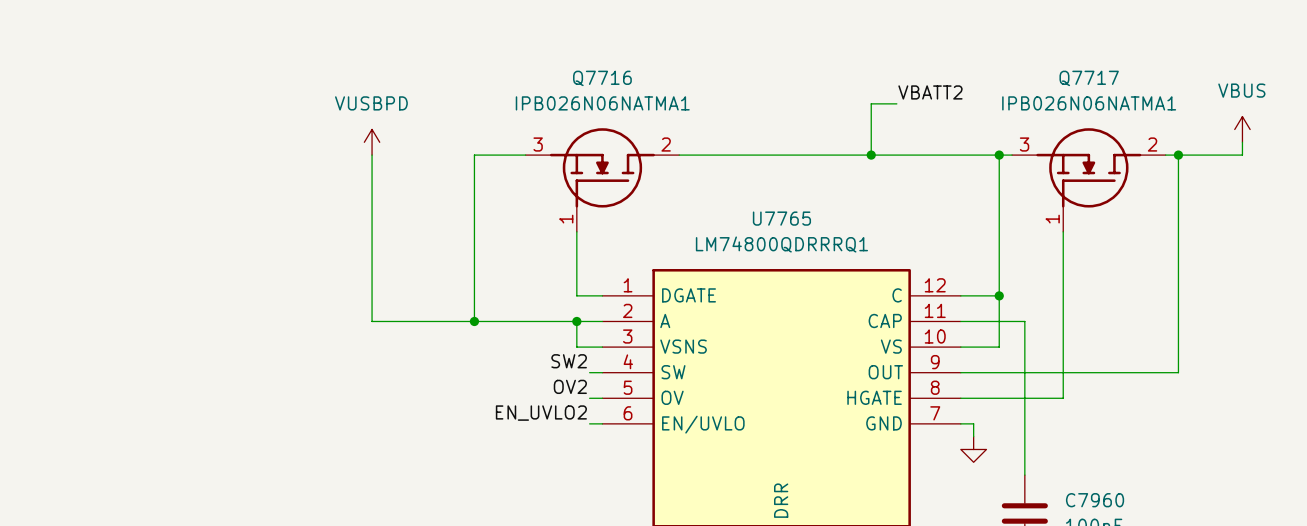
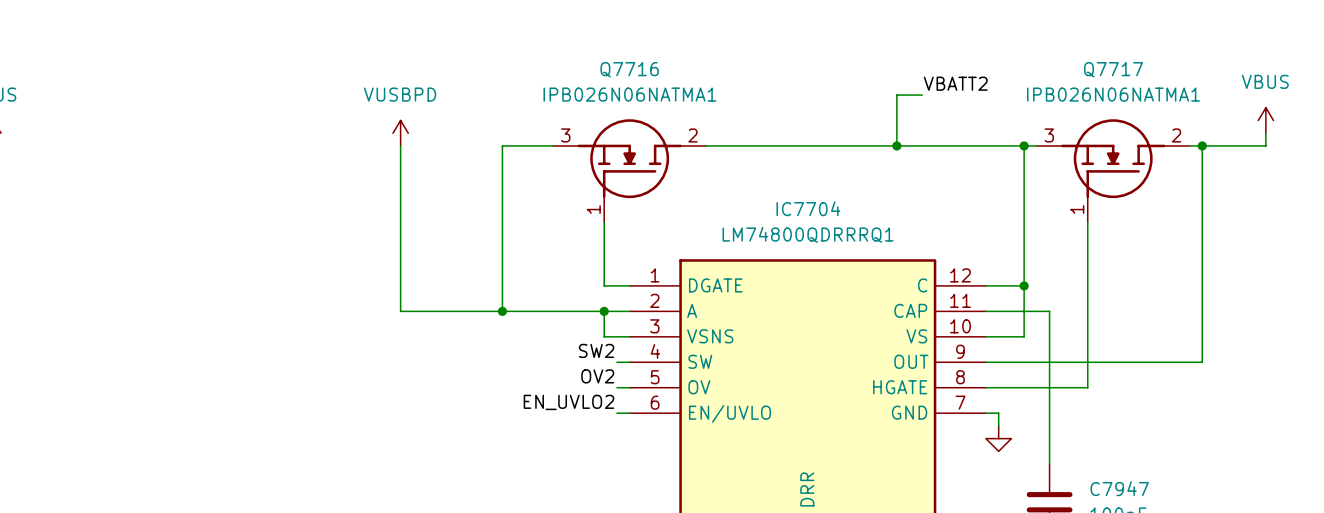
U7765 name: U7765 (781, 218) -> IC7704 (808, 208)
C7960 name: C7960 (1095, 500) -> C7947 (1119, 488)

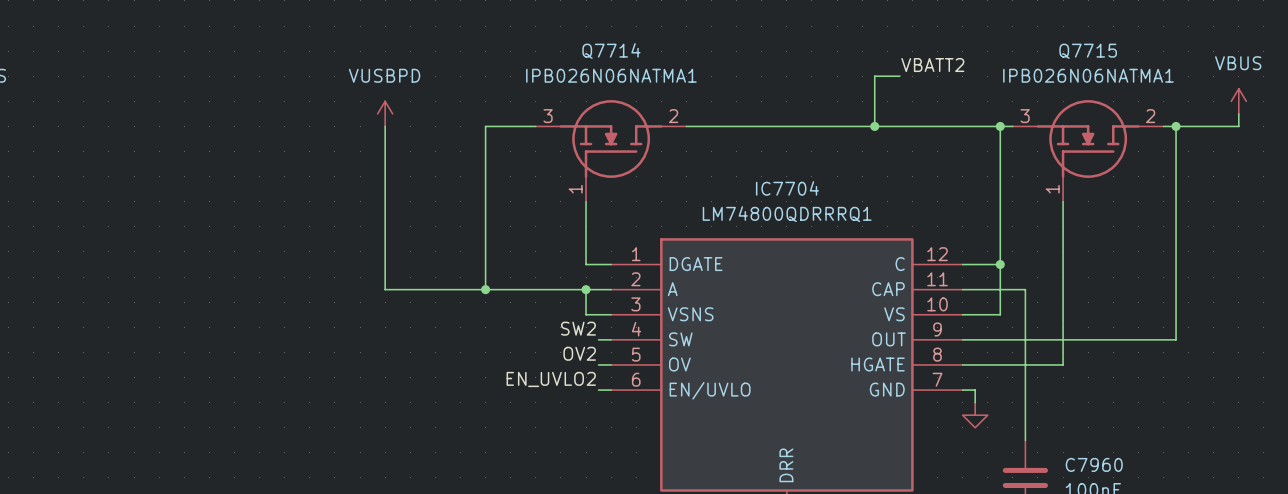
Q7716 name: Q7716 (629, 69) -> Q7714 (611, 50)
Q7717 name: Q7717 (1113, 69) -> Q7715 (1088, 51)
C7947 name: C7947 (1119, 488) -> C7960 (1094, 464)

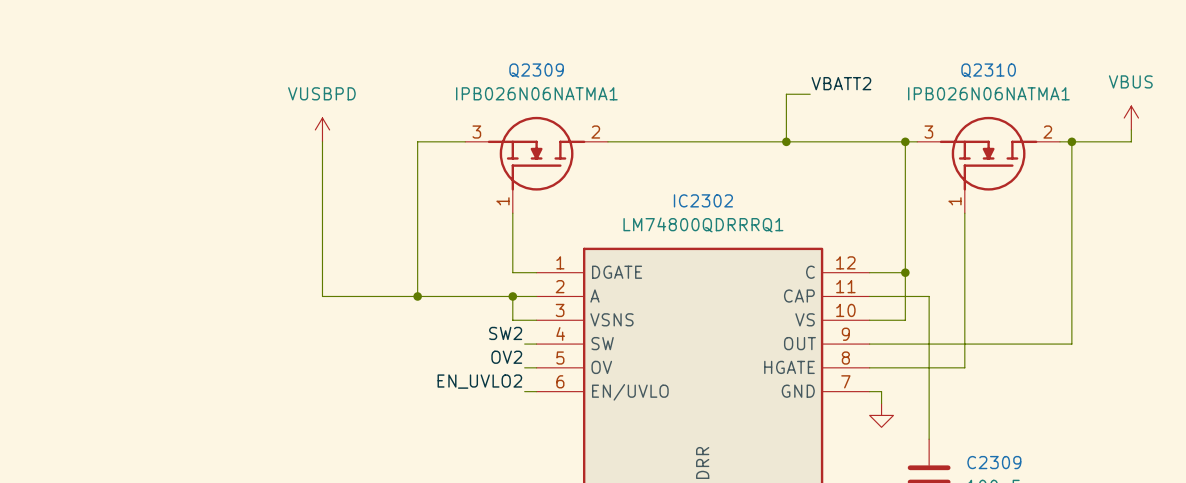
Q7714 name: Q7714 (611, 50) -> Q2309 (536, 70)
Q7715 name: Q7715 (1088, 51) -> Q2310 (988, 70)
IC7704 name: IC7704 (787, 188) -> IC2302 (703, 200)
C7960 name: C7960 (1094, 464) -> C2309 (994, 462)

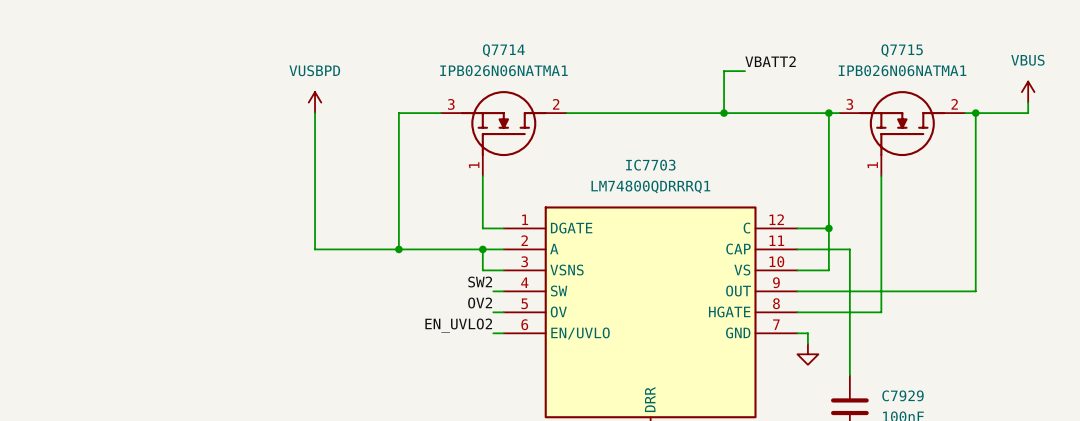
Q2309 name: Q2309 (536, 70) -> Q7714 (503, 50)
Q2310 name: Q2310 (988, 70) -> Q7715 (902, 50)
IC2302 name: IC2302 (703, 200) -> IC7703 (650, 165)
C2309 name: C2309 (994, 462) -> C7929 (903, 395)

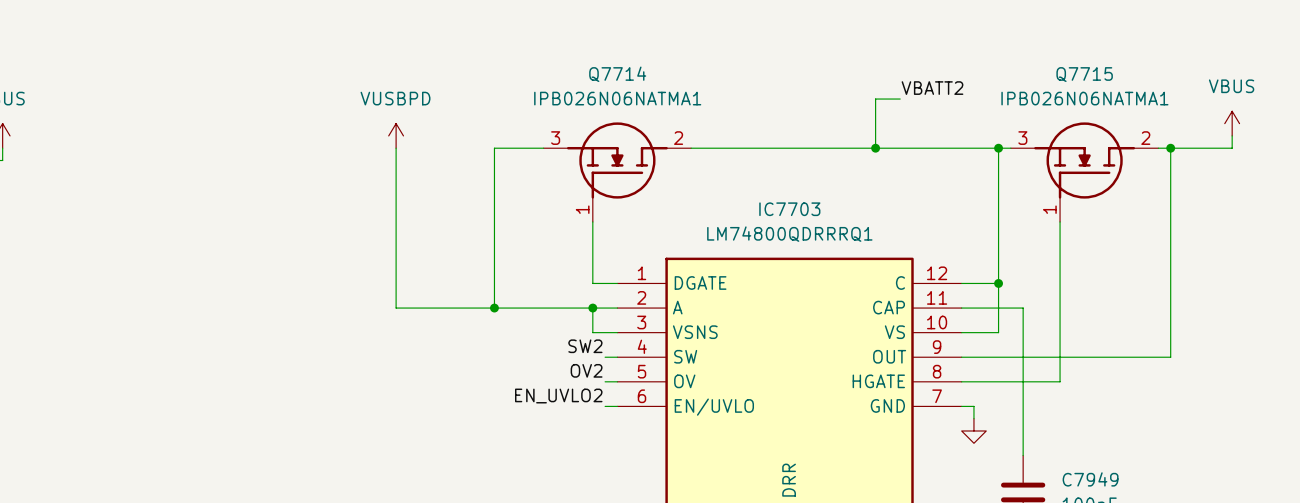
C7929 name: C7929 (903, 395) -> C7949 (1090, 479)

